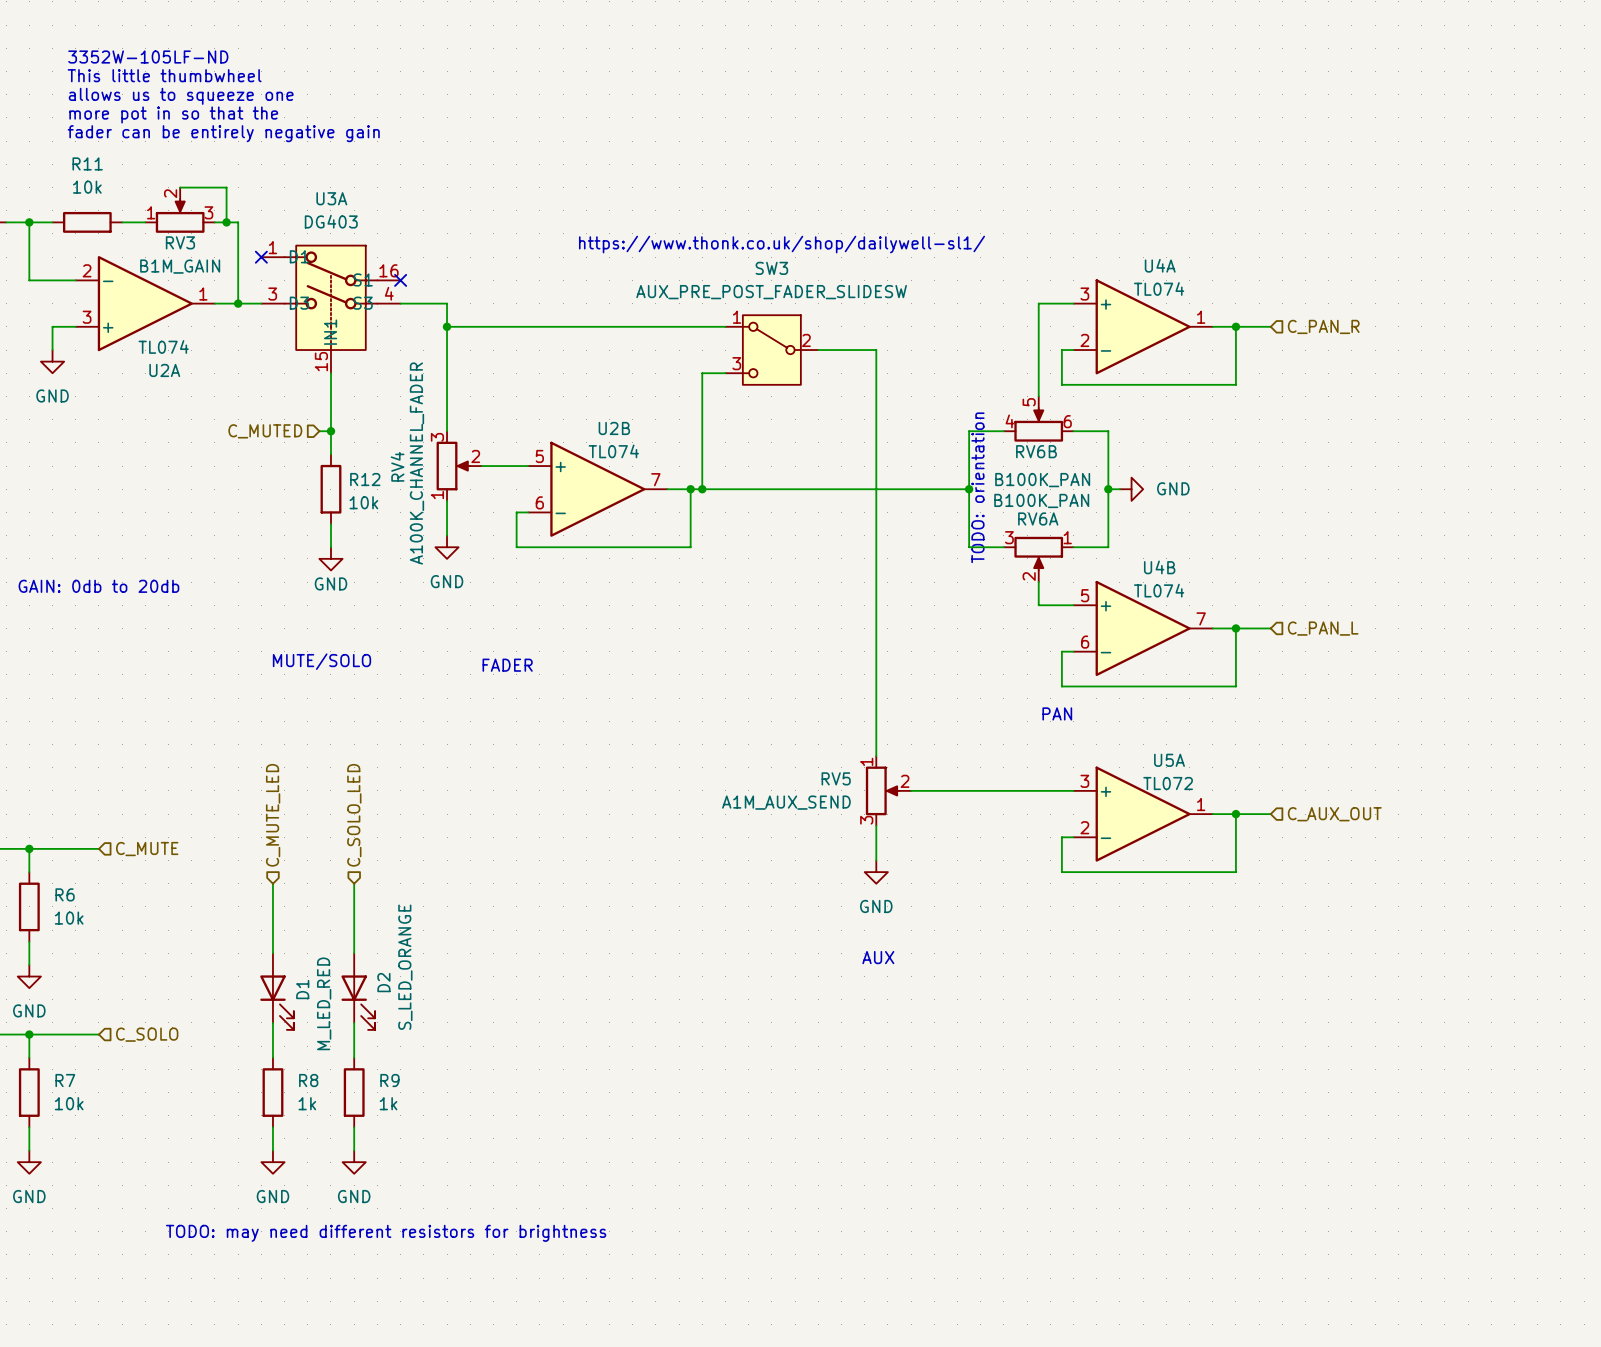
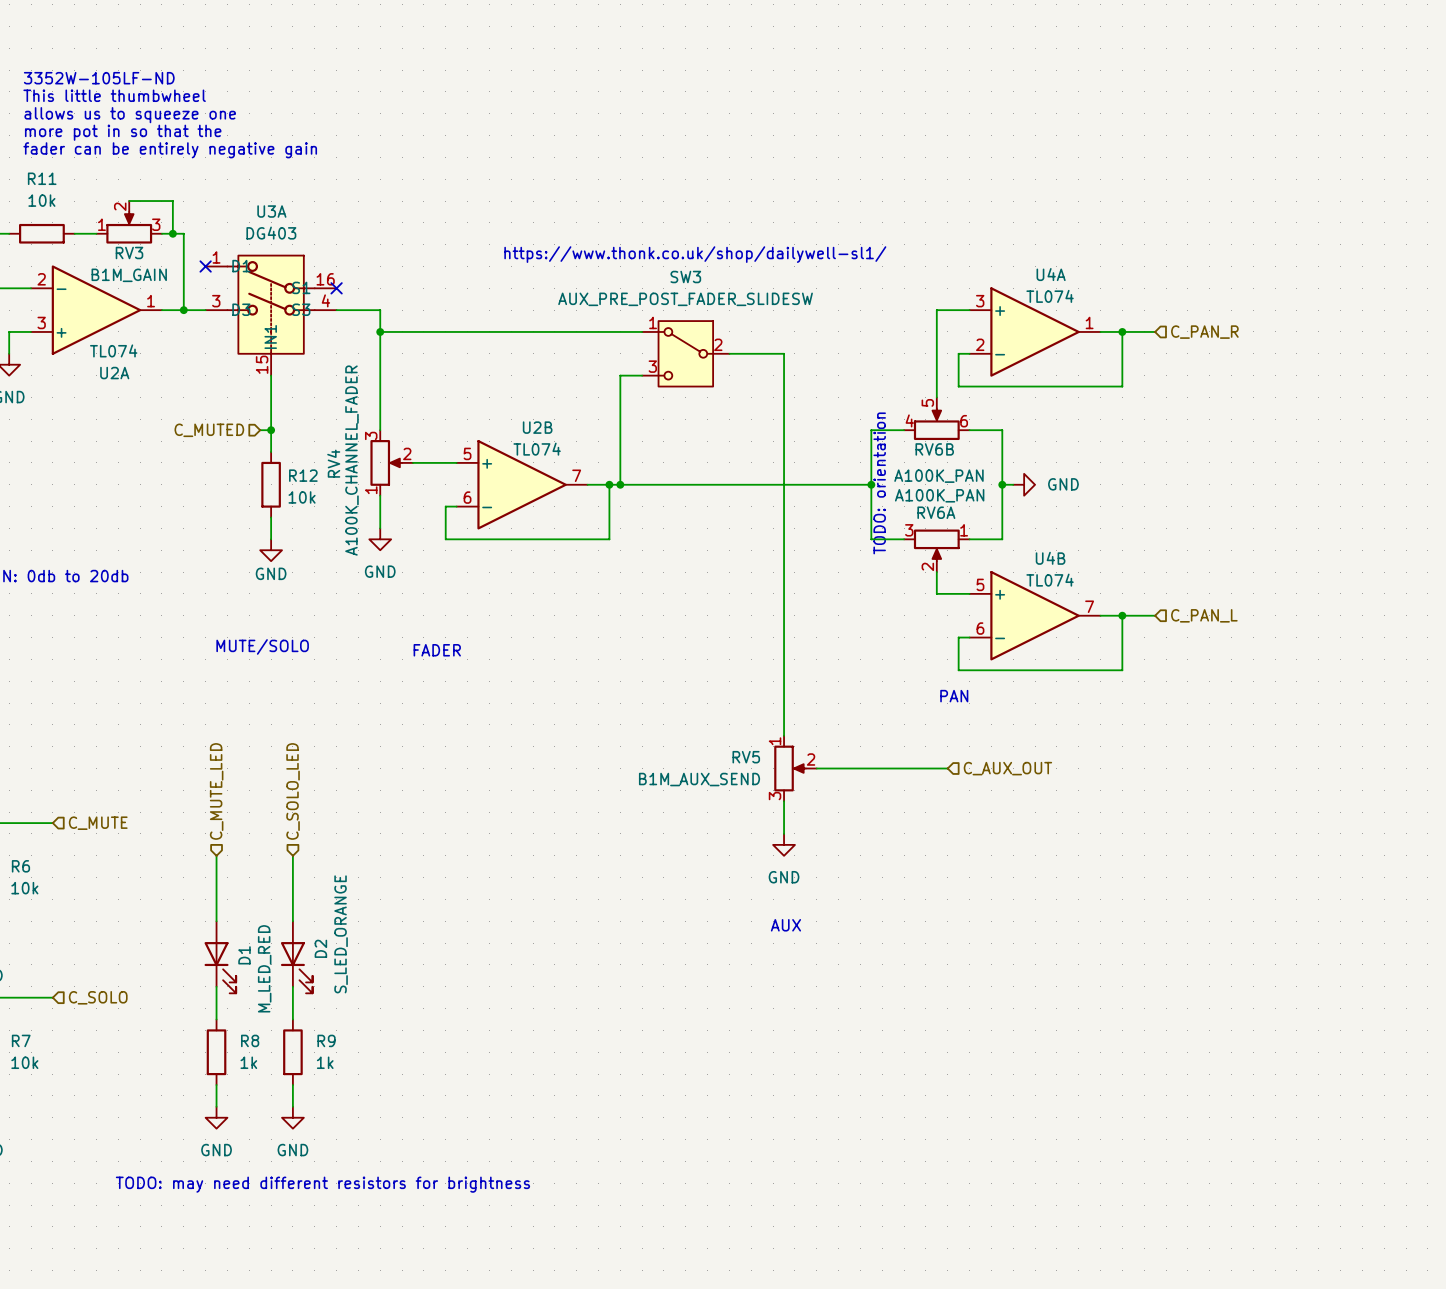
RV6B value: B100K_PAN (1042, 480) -> A100K_PAN (938, 476)
RV6A value: B100K_PAN (1041, 500) -> A100K_PAN (939, 495)
wire: (1050, 790) (1073, 790) -> none
RV5 value: A1M_AUX_SEND (786, 802) -> B1M_AUX_SEND (699, 779)
U5A: TL072 (1143, 814) -> none
wire: (1212, 814) (1270, 814) -> none
wire: (1235, 814) (1235, 872) (1061, 872) (1061, 837) (1073, 837) -> none
junction: (1235, 814) -> none
hierarchical label position: C_AUX_OUT (1334, 814) -> C_AUX_OUT (1007, 768)

